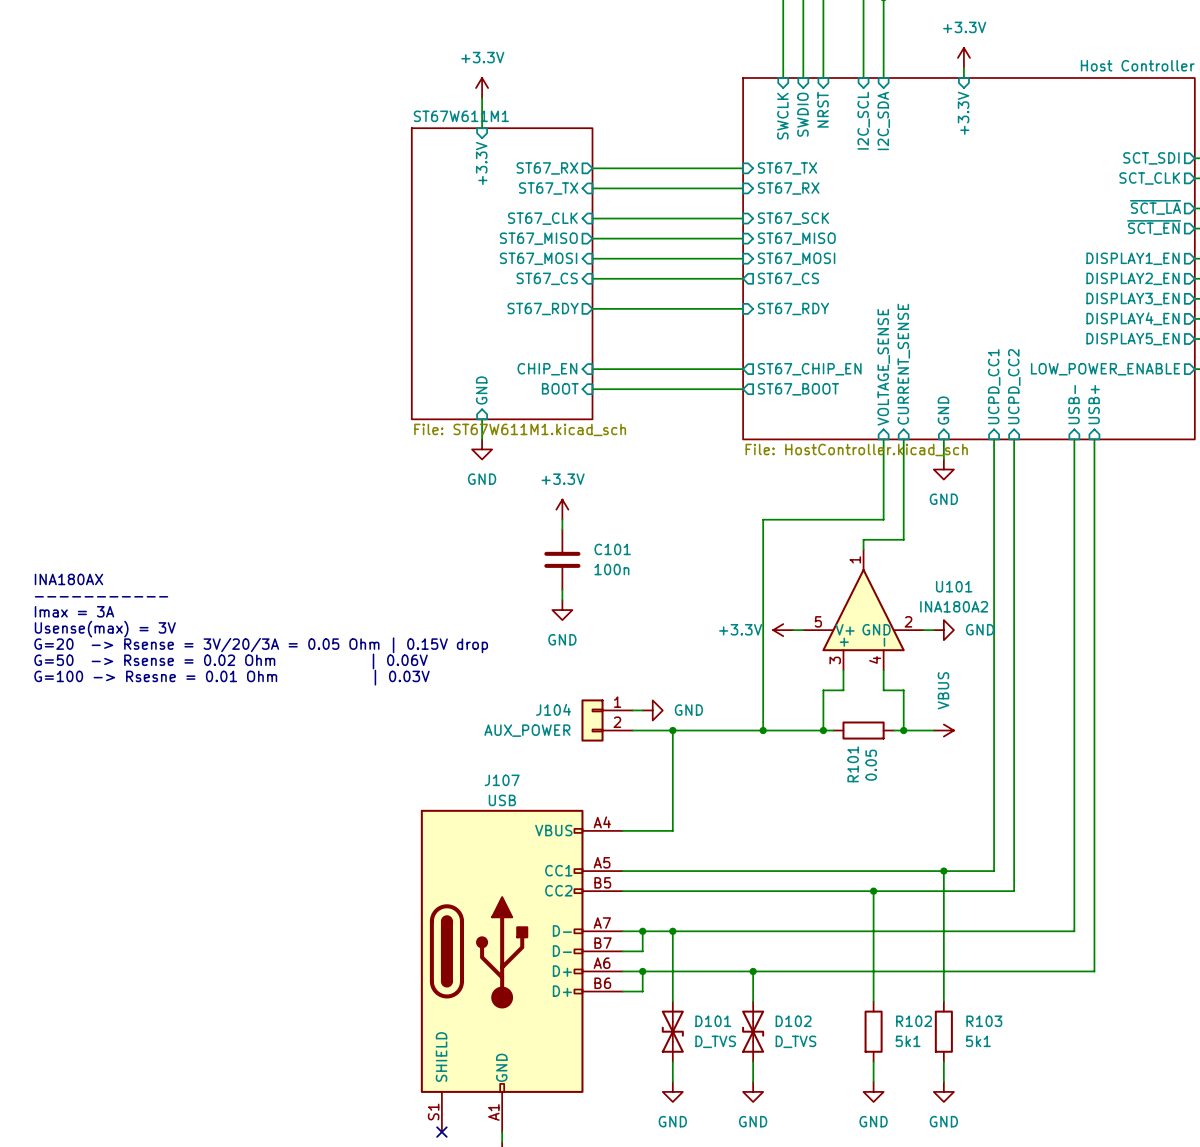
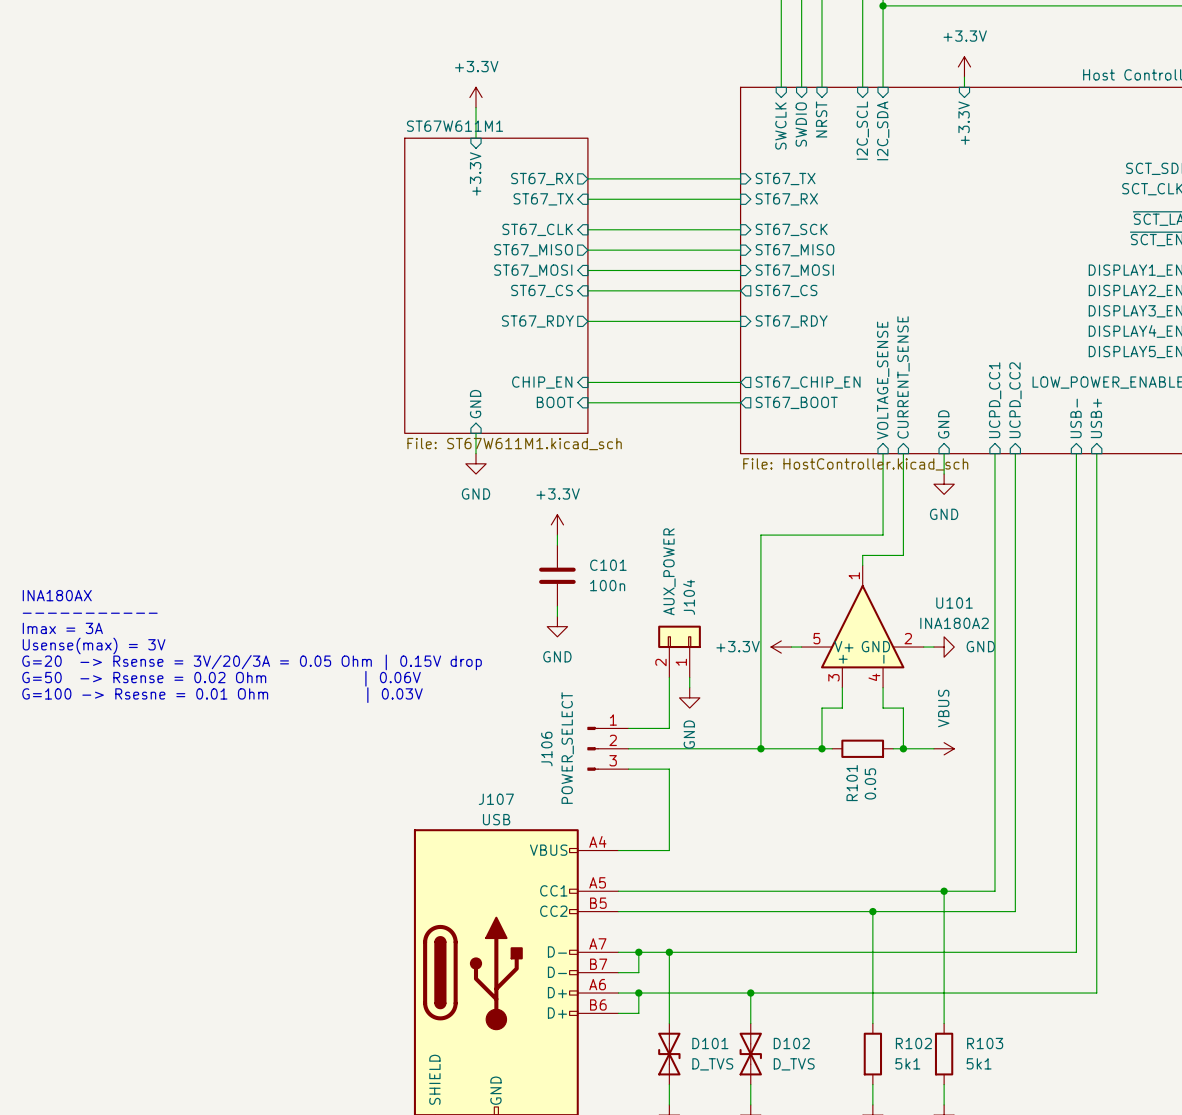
wire: none -> (669, 677) (669, 728) (638, 728)
wire: none -> (689, 677) (689, 687)
power symbol rotation: 0° (652, 710) -> 90° clockwise (689, 697)
power symbol position: GND (652, 710) -> GND (689, 697)
J104 rotation: 0° (592, 720) -> 90° clockwise (679, 636)
J104 position: (607, 720) -> (679, 651)
J106: none -> POWER_SELECT (607, 748)
wire: (672, 730) (672, 750) -> (628, 769) (669, 769)
junction: (672, 730) -> none

